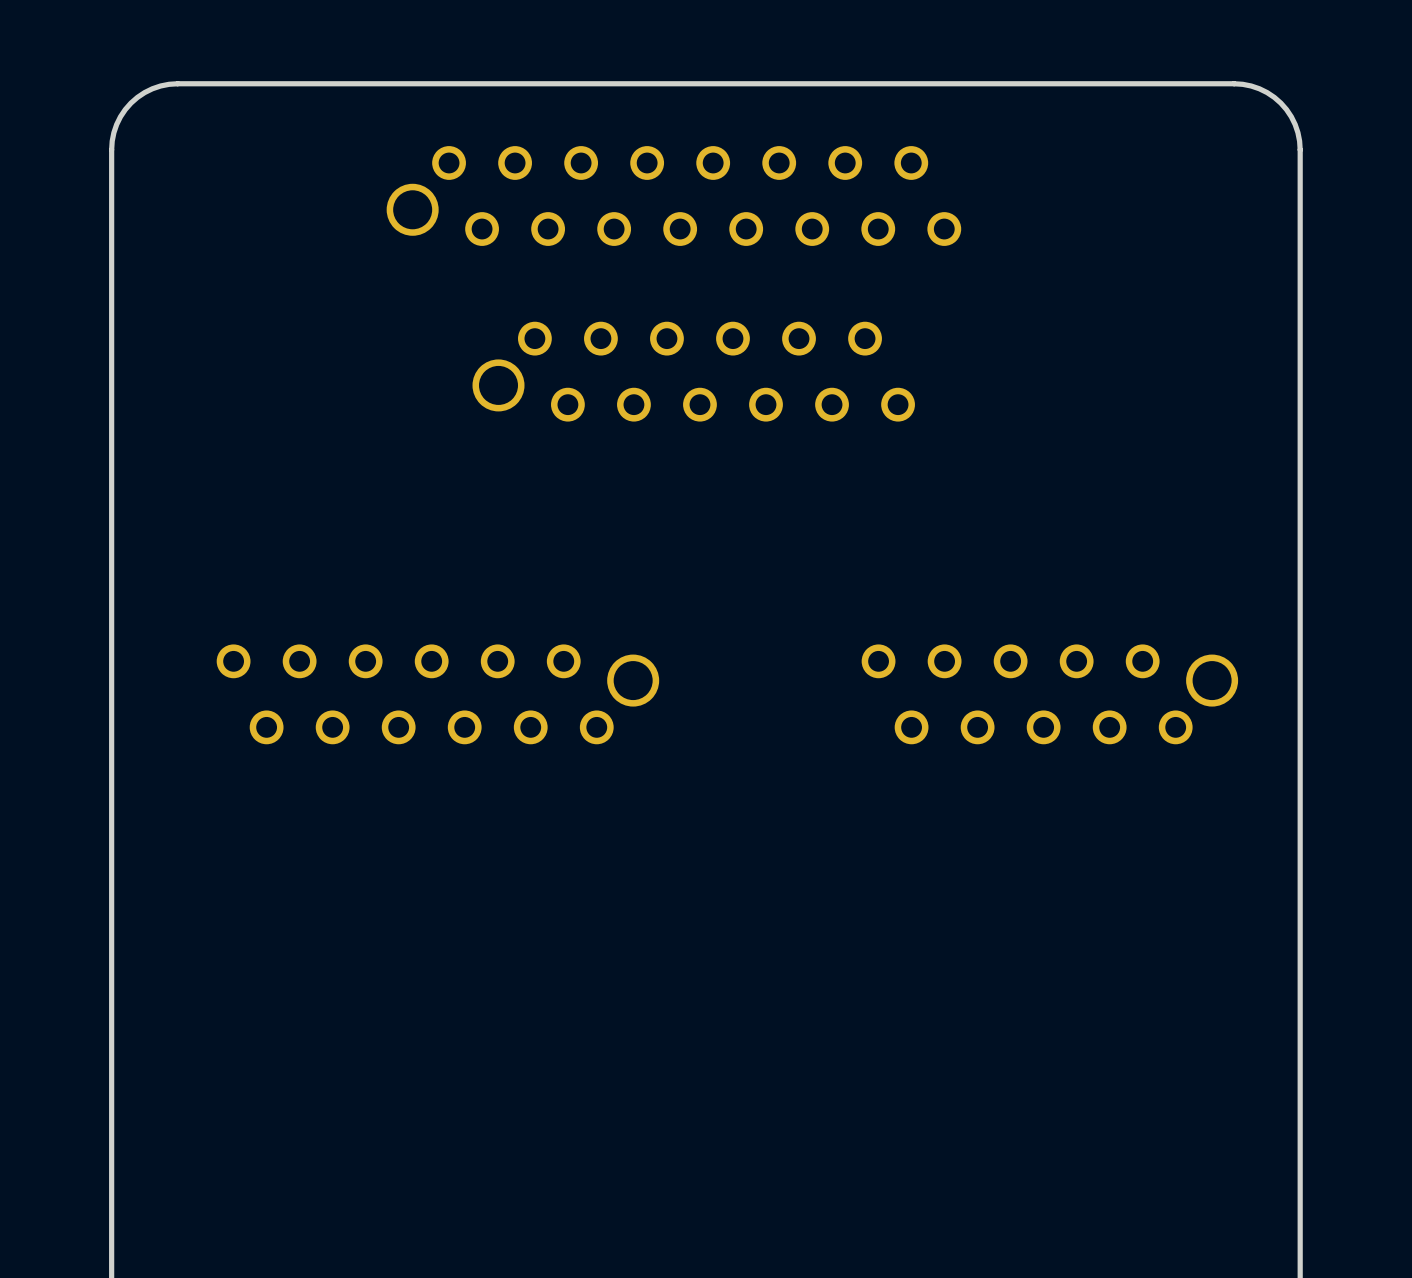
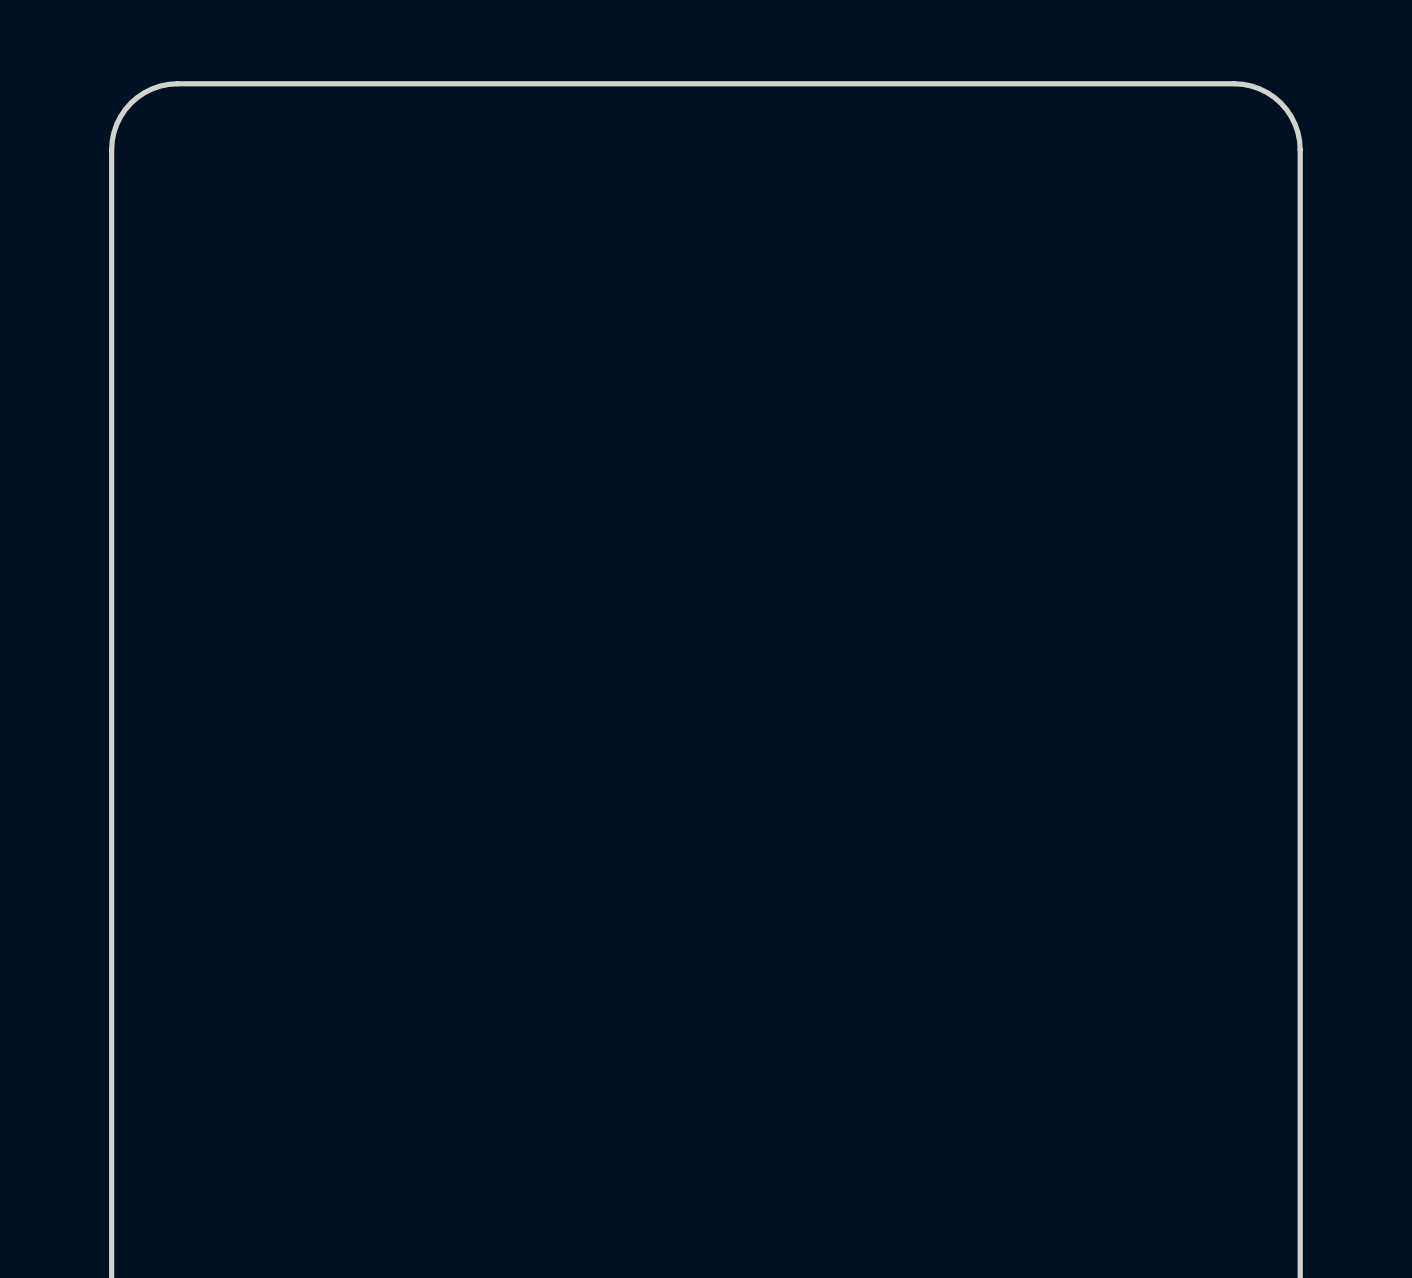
part: (673, 196) -> none
part: (693, 371) -> none
part: (437, 694) -> none
part: (1049, 694) -> none

